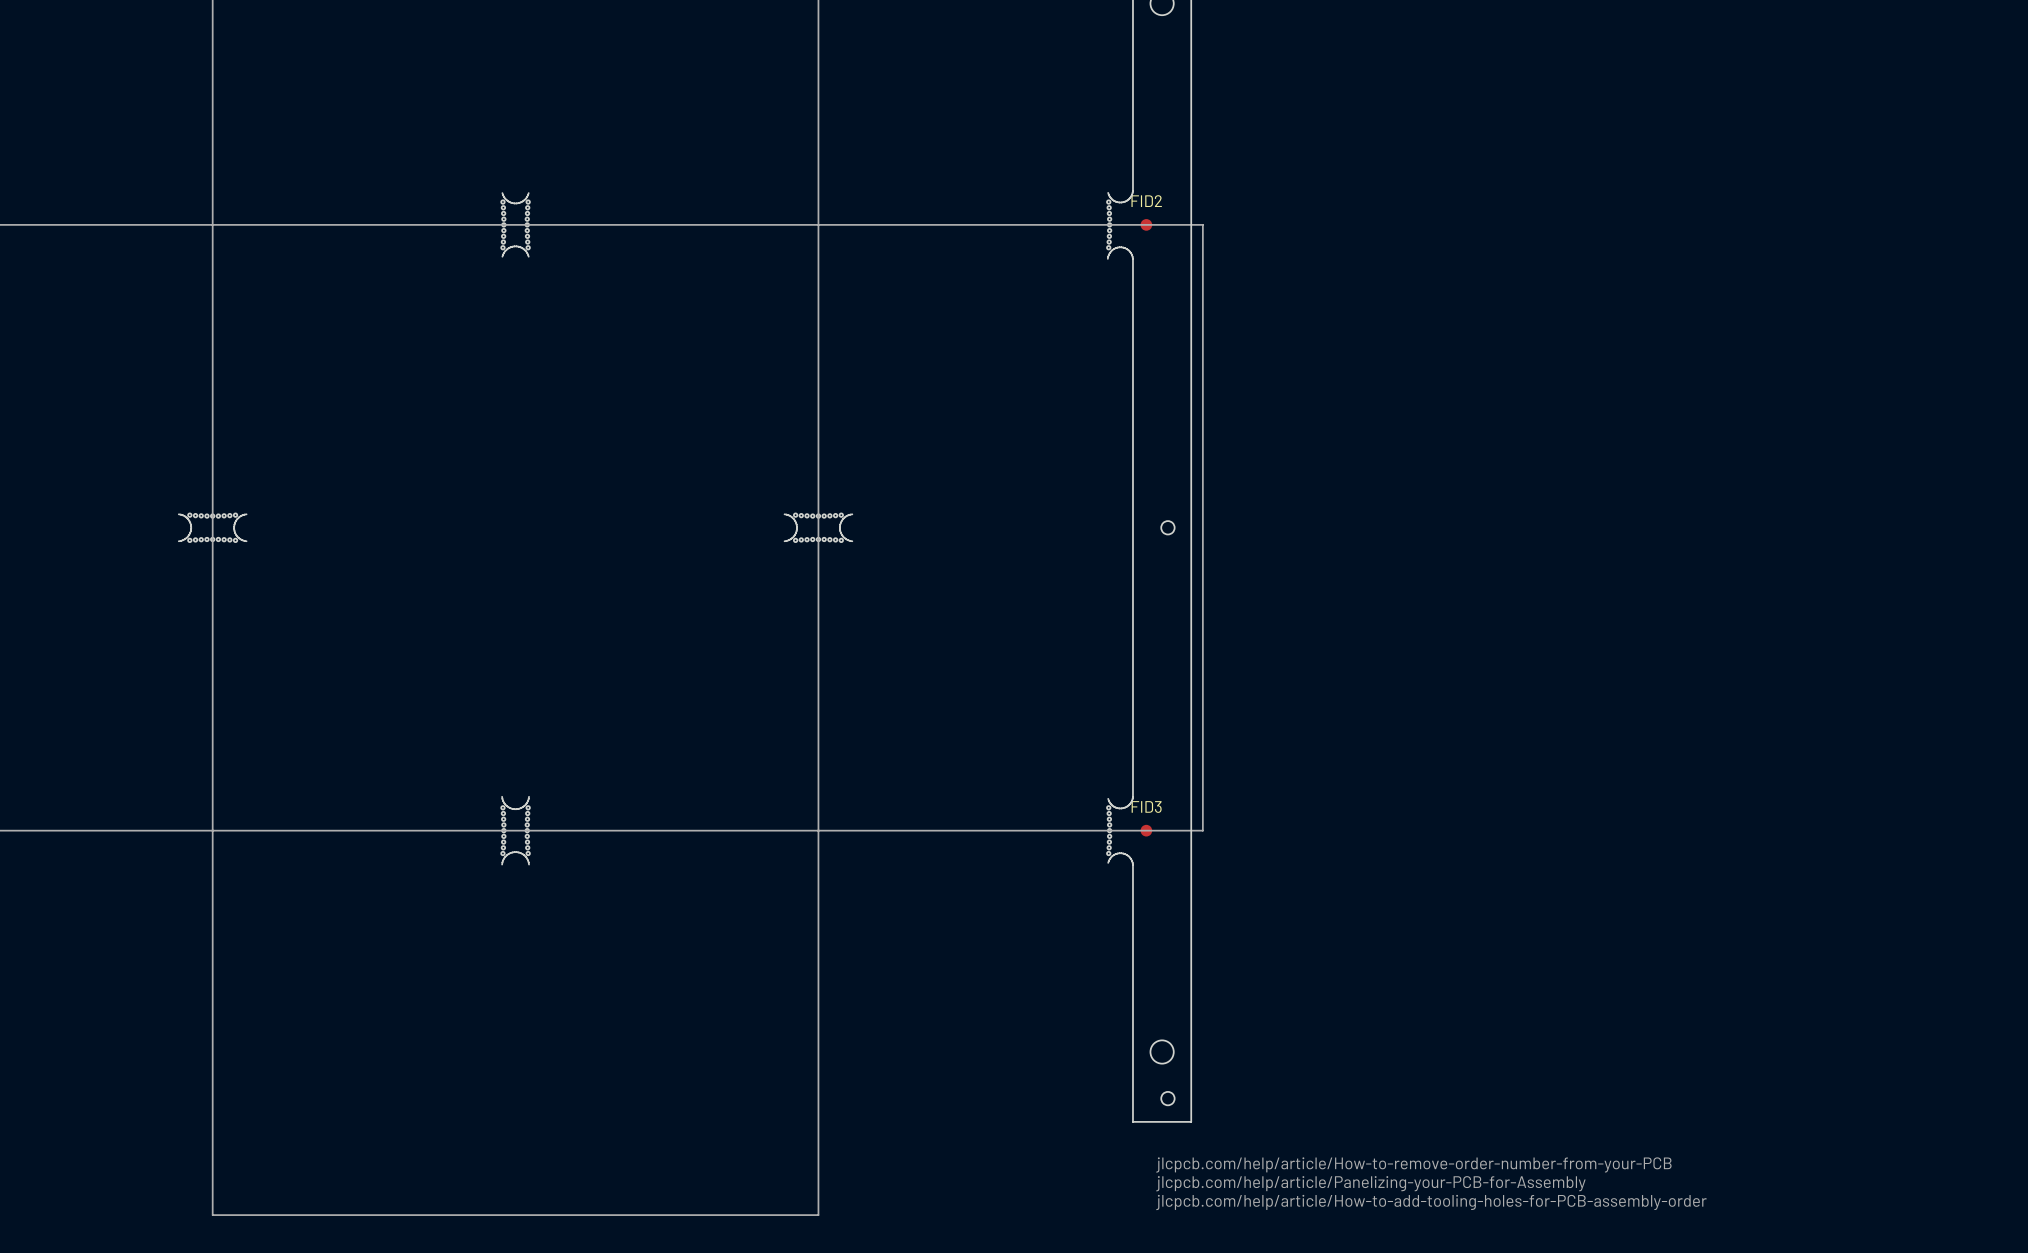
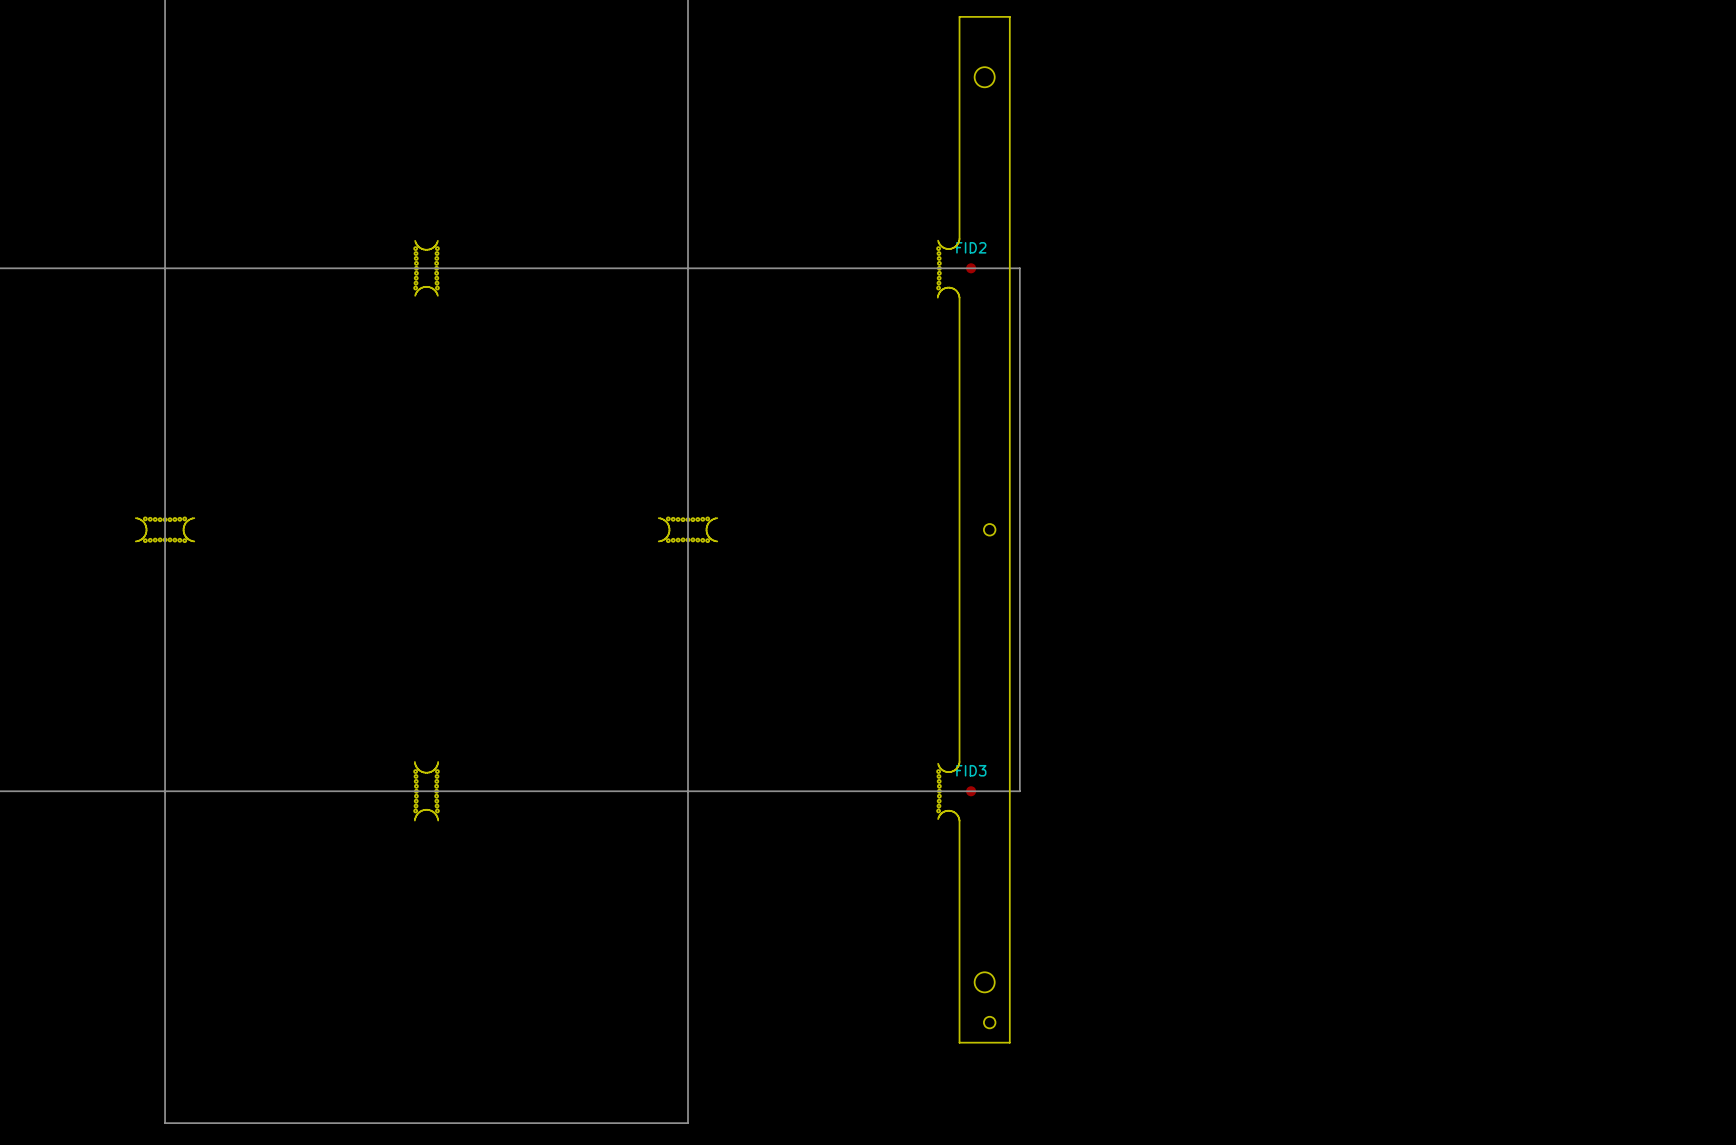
text: jlcpcb.com/help/article/How-to-remove-order-number-from-your-PCB (1413, 1164) -> none
text: jlcpcb.com/help/article/Panelizing-your-PCB-for-Assembly (1370, 1183) -> none
text: jlcpcb.com/help/article/How-to-add-tooling-holes-for-PCB-assembly-order (1431, 1202) -> none

